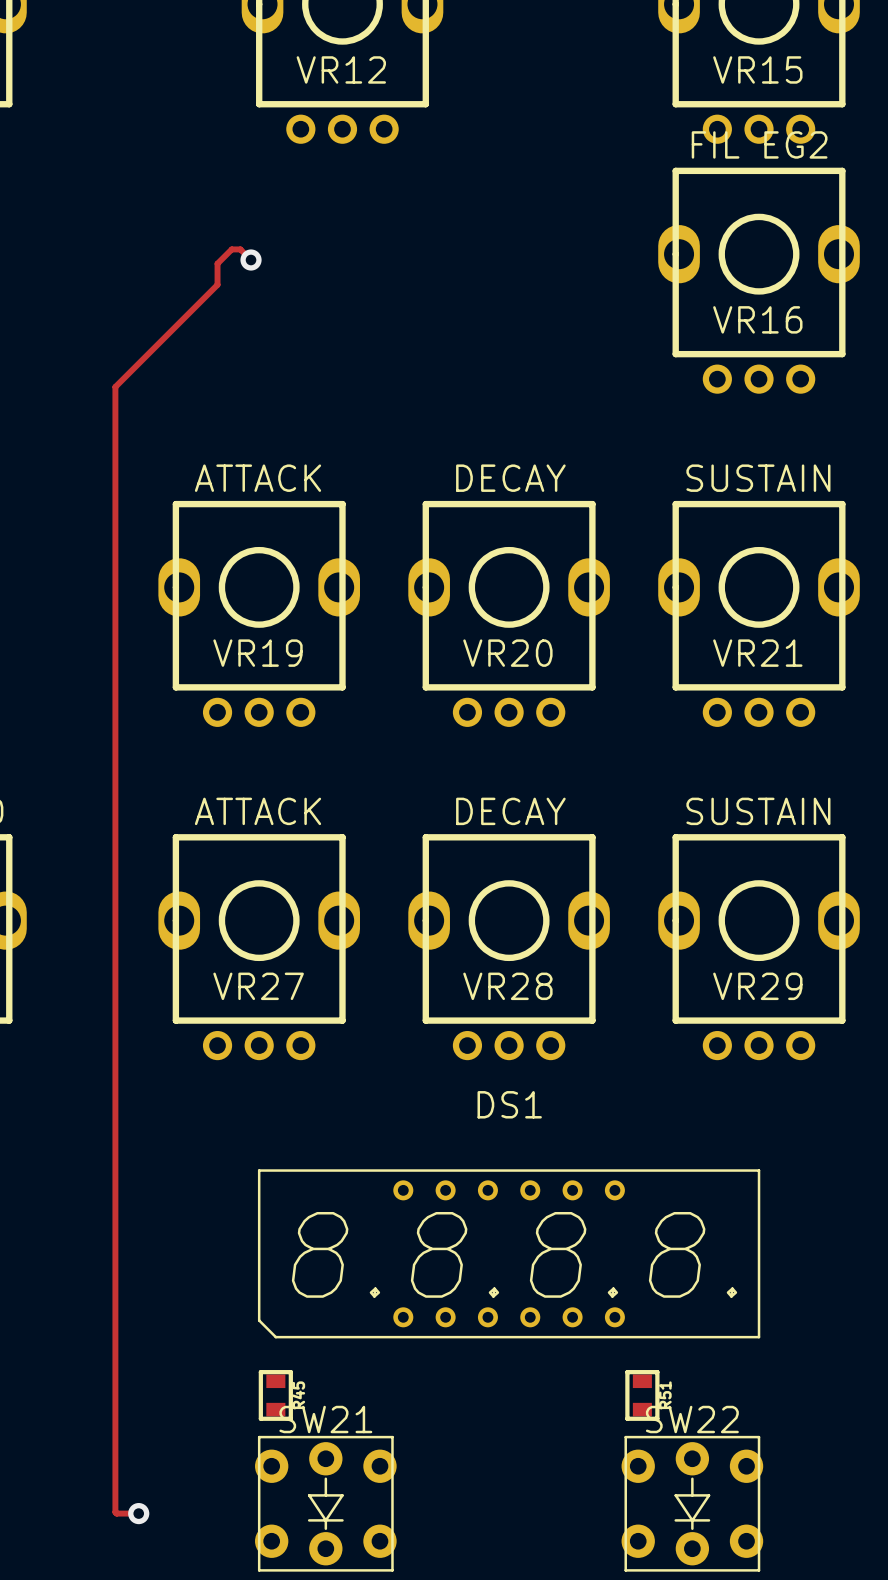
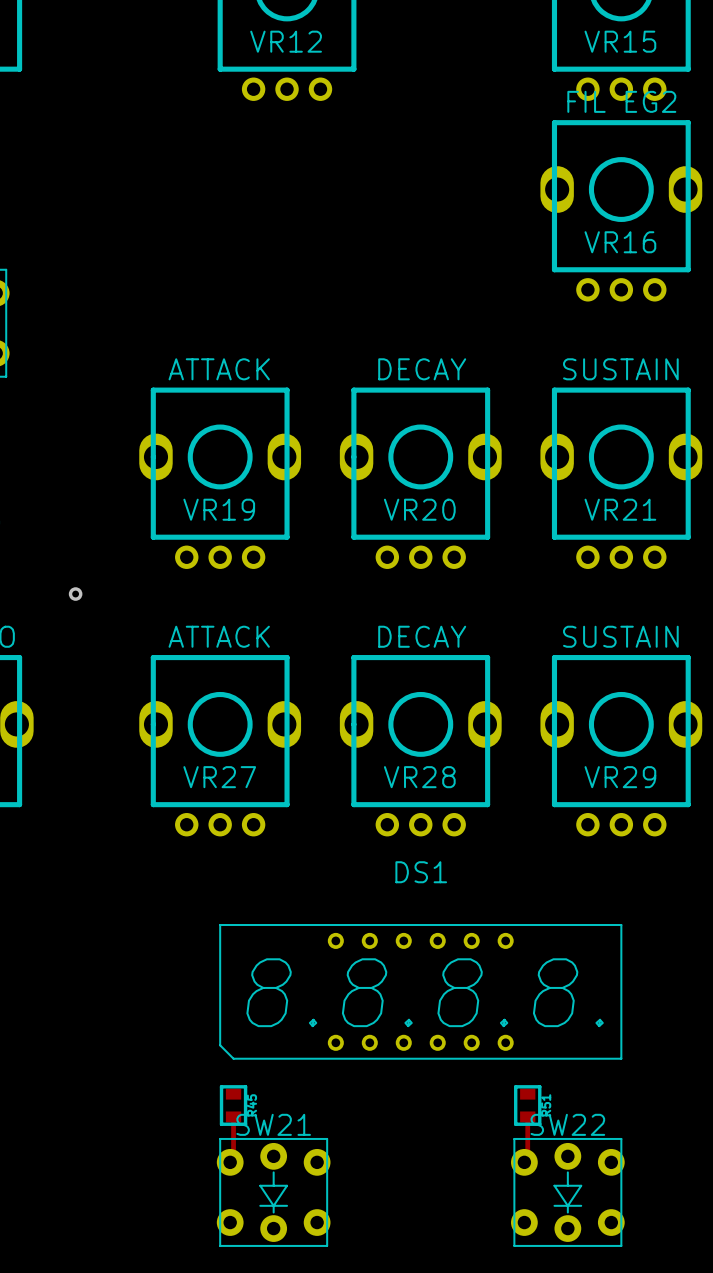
track: (251, 260) (240, 249) (231, 249) (217, 263) (217, 284) (115, 386) (115, 1512) (138, 1513) -> none
via: (251, 260) -> none
via: none -> (75, 594)
track: none -> (233, 1116) (233, 1159) (230, 1162)
track: none -> (527, 1116) (527, 1159) (524, 1162)
via: (138, 1513) -> none

